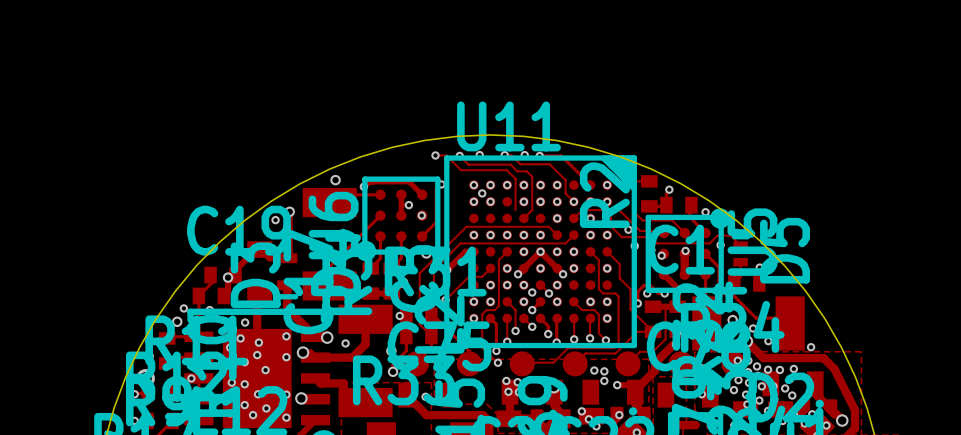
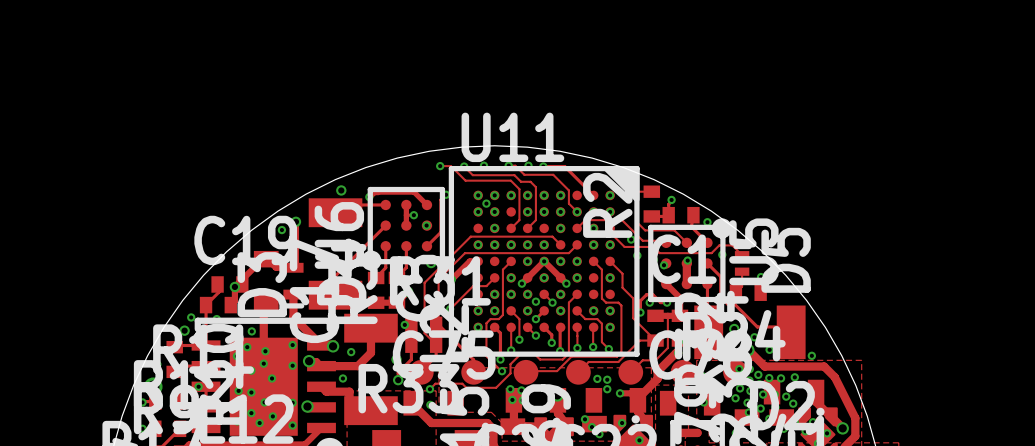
track: none -> (519, 220) (511, 228)
via: none -> (494, 228)
track: none -> (577, 294) (568, 302) (568, 353) (562, 359) (540, 359) (533, 353) (521, 353) (510, 364) (510, 373) (496, 387) (466, 387) (462, 383) (435, 383) (429, 389)
via: none -> (342, 378)
via: none -> (429, 389)

